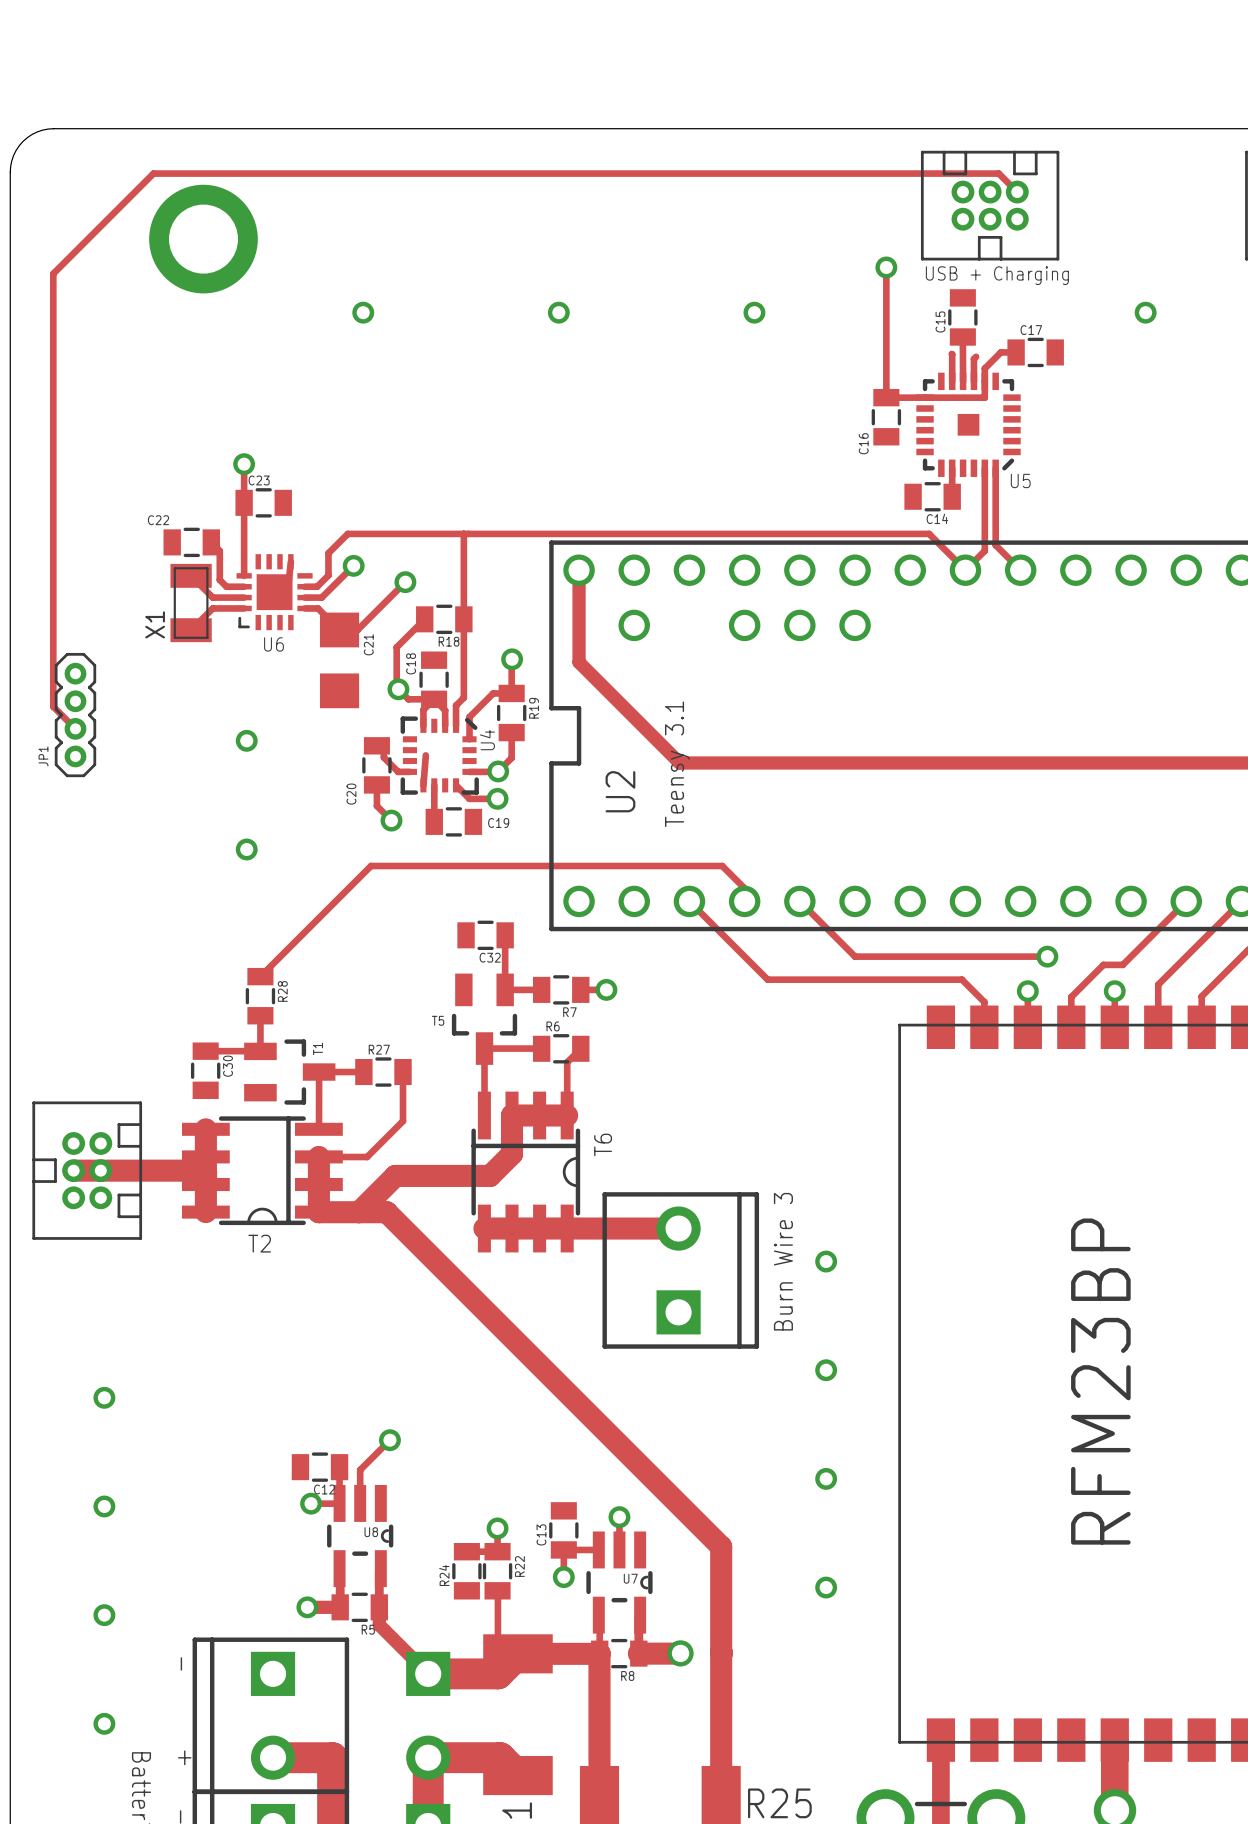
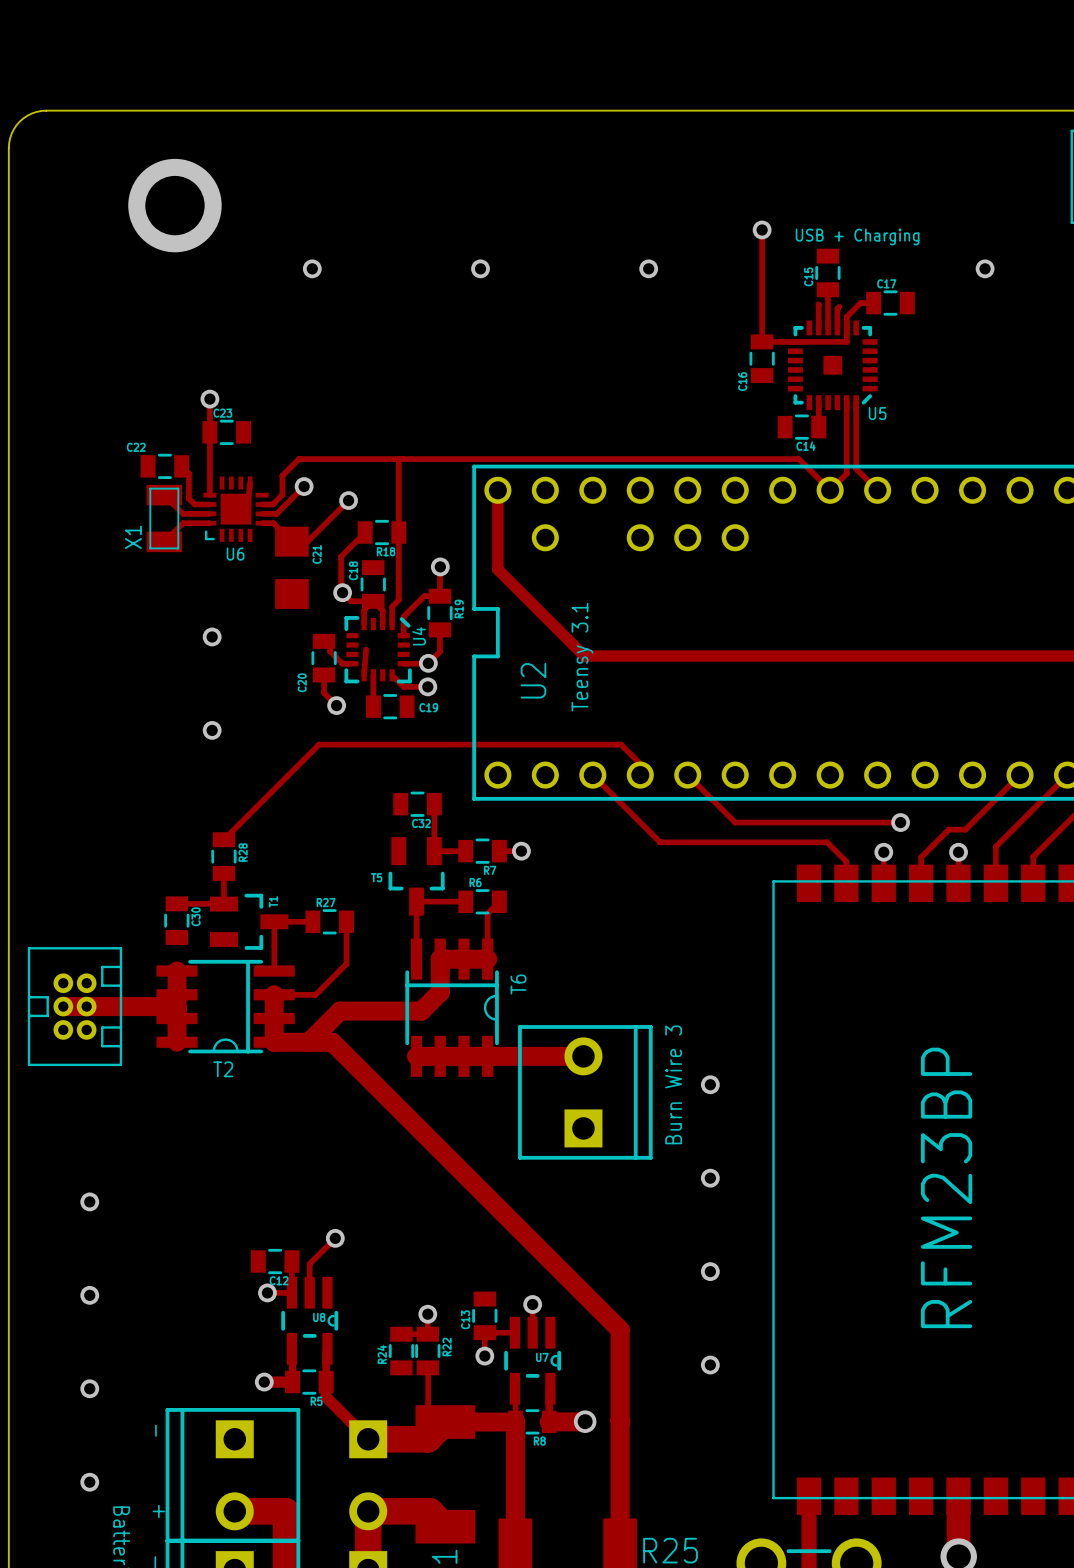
track: (1017, 192) (998, 173) (153, 173) (53, 273) (53, 706) (75, 728) -> none
part: (990, 205) -> none
JP1: (75, 715) -> none

